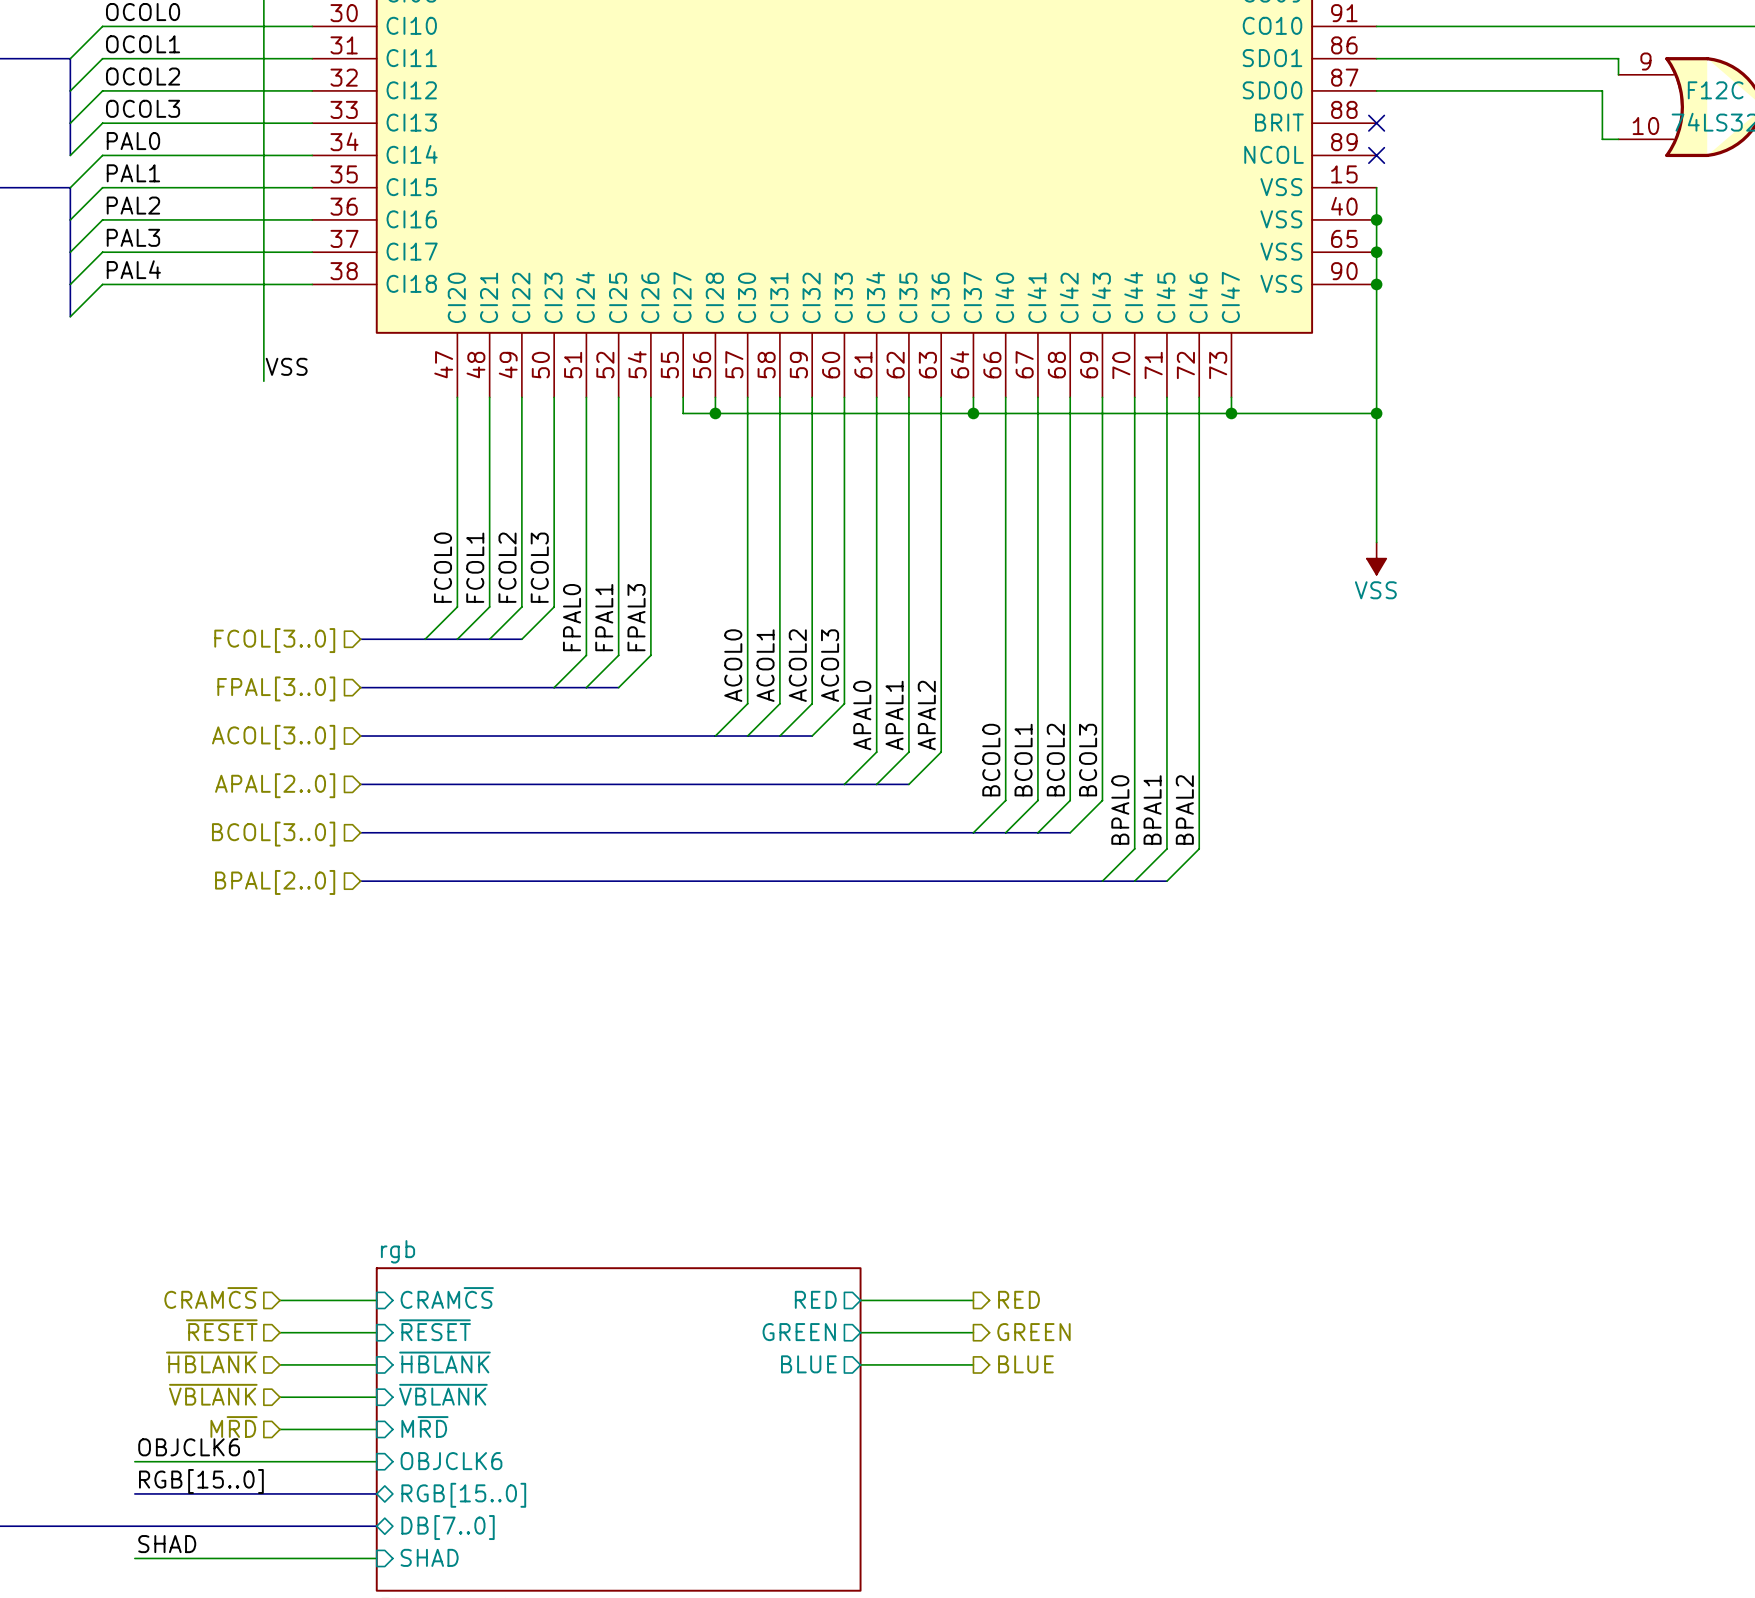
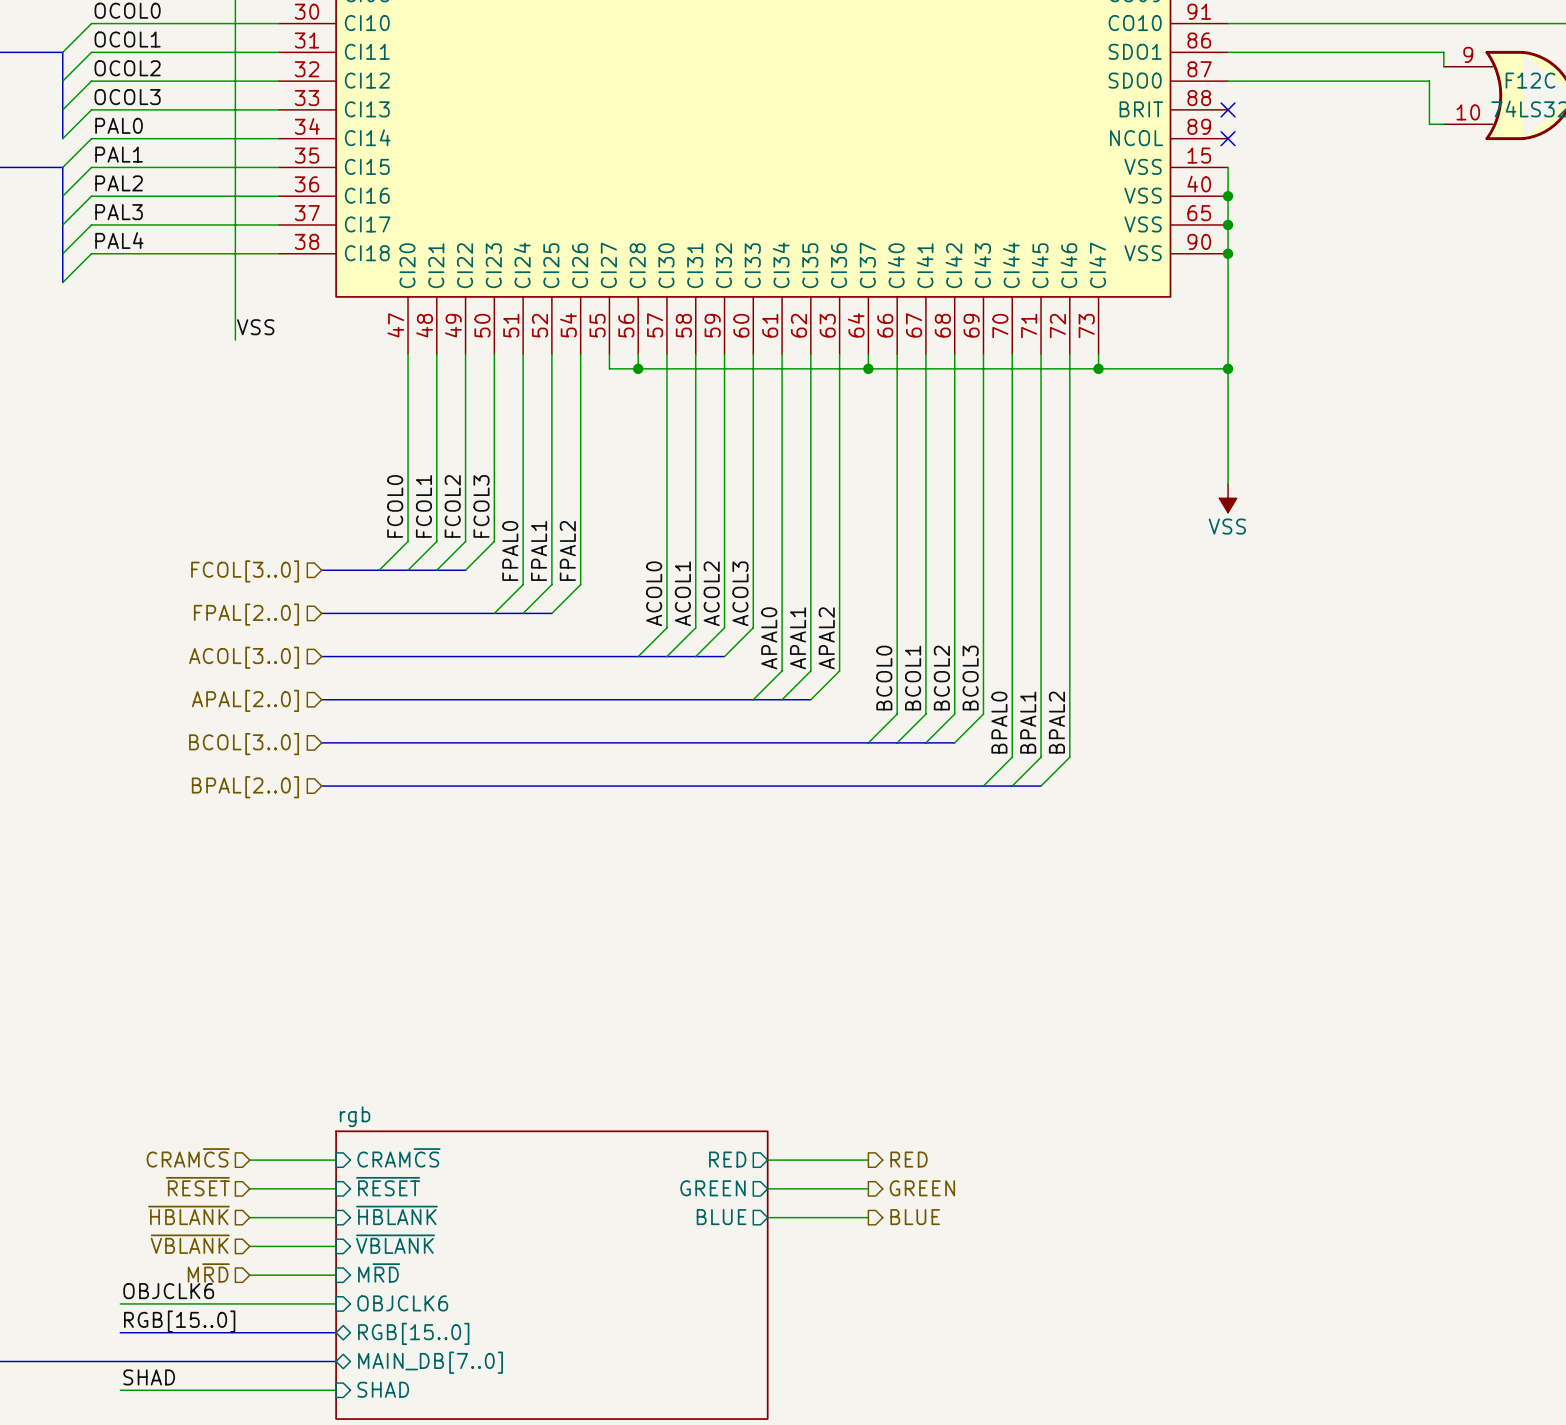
label: FPAL3 (636, 617) -> FPAL2 (567, 550)
hierarchical label: FPAL[3..0] (276, 688) -> FPAL[2..0] (246, 614)
sheet pin: DB[7..0] (448, 1527) -> MAIN_DB[7..0] (430, 1362)

